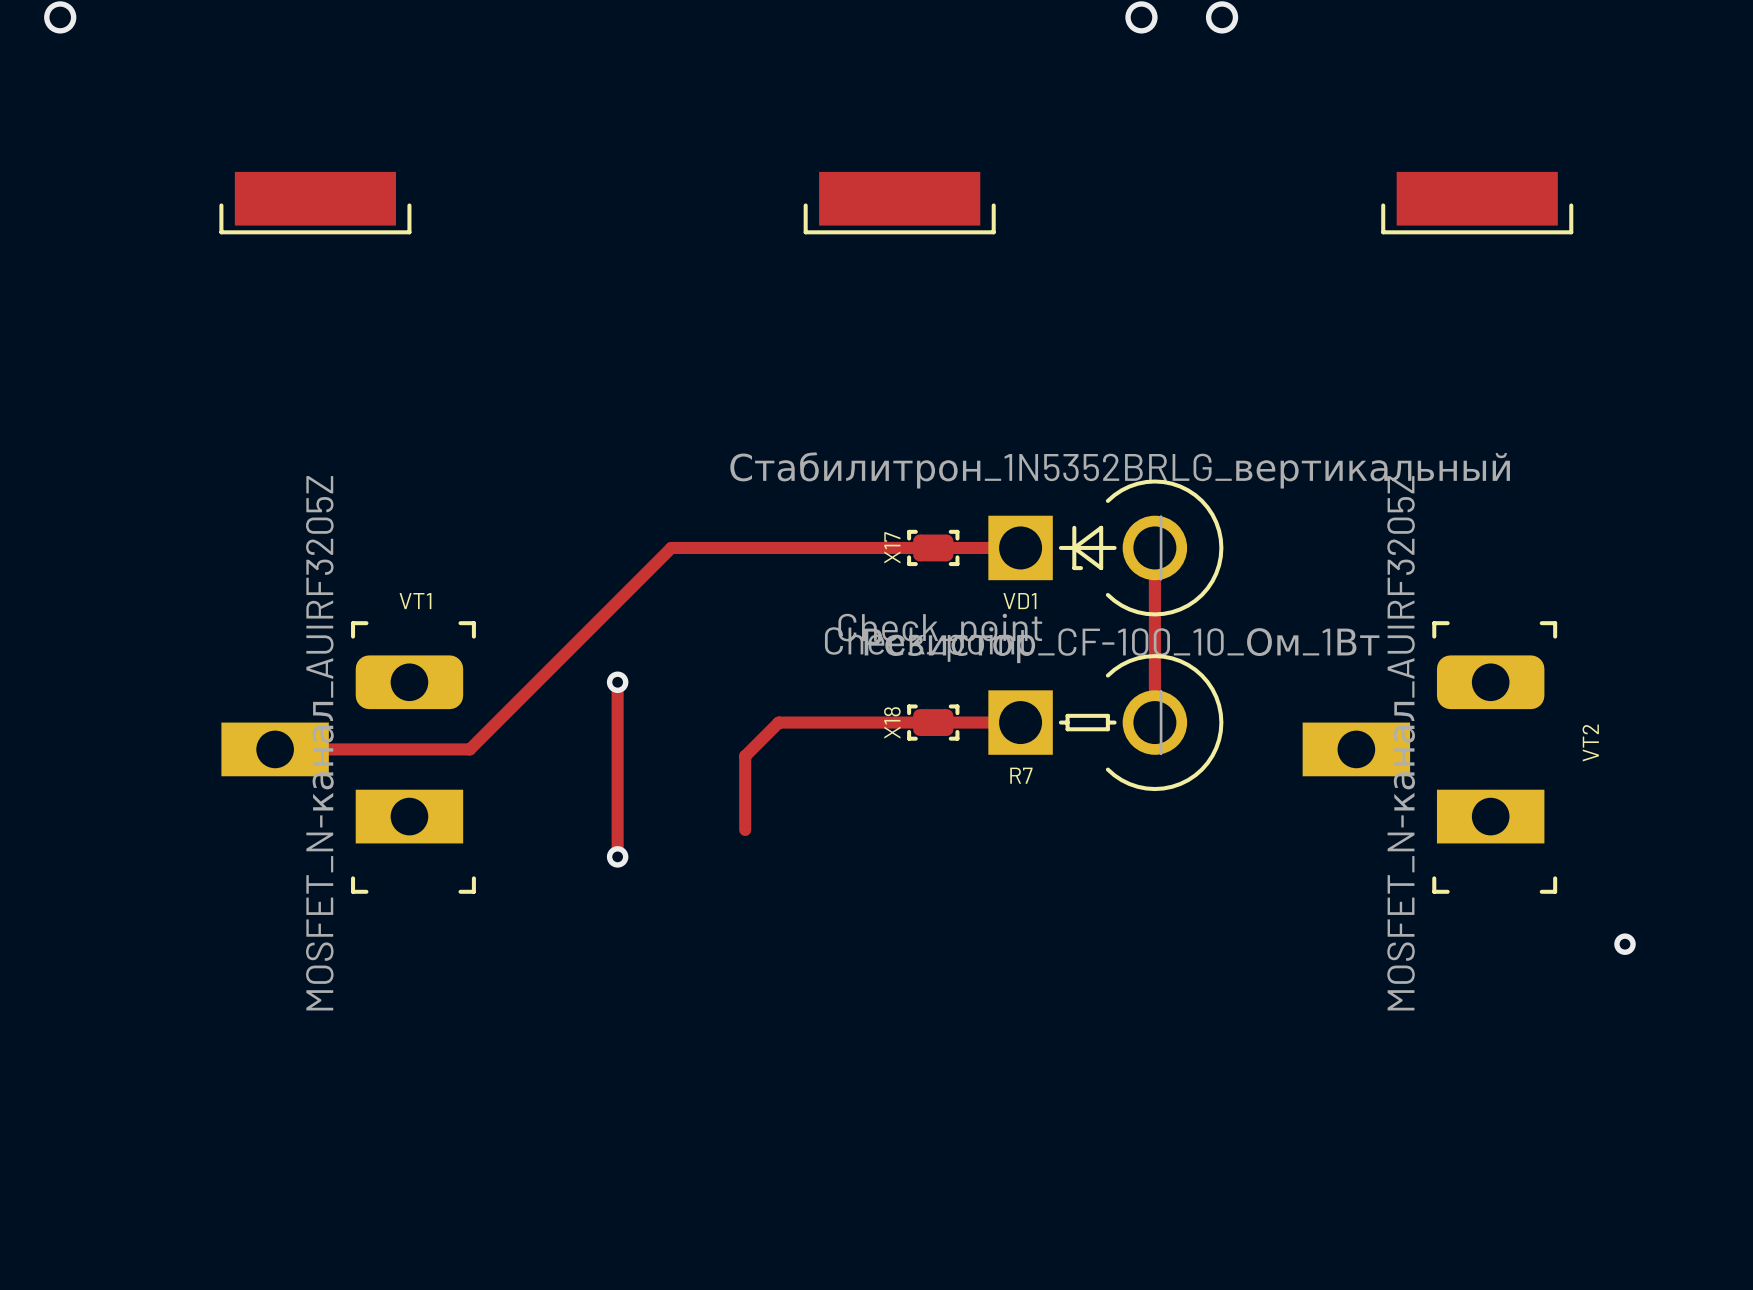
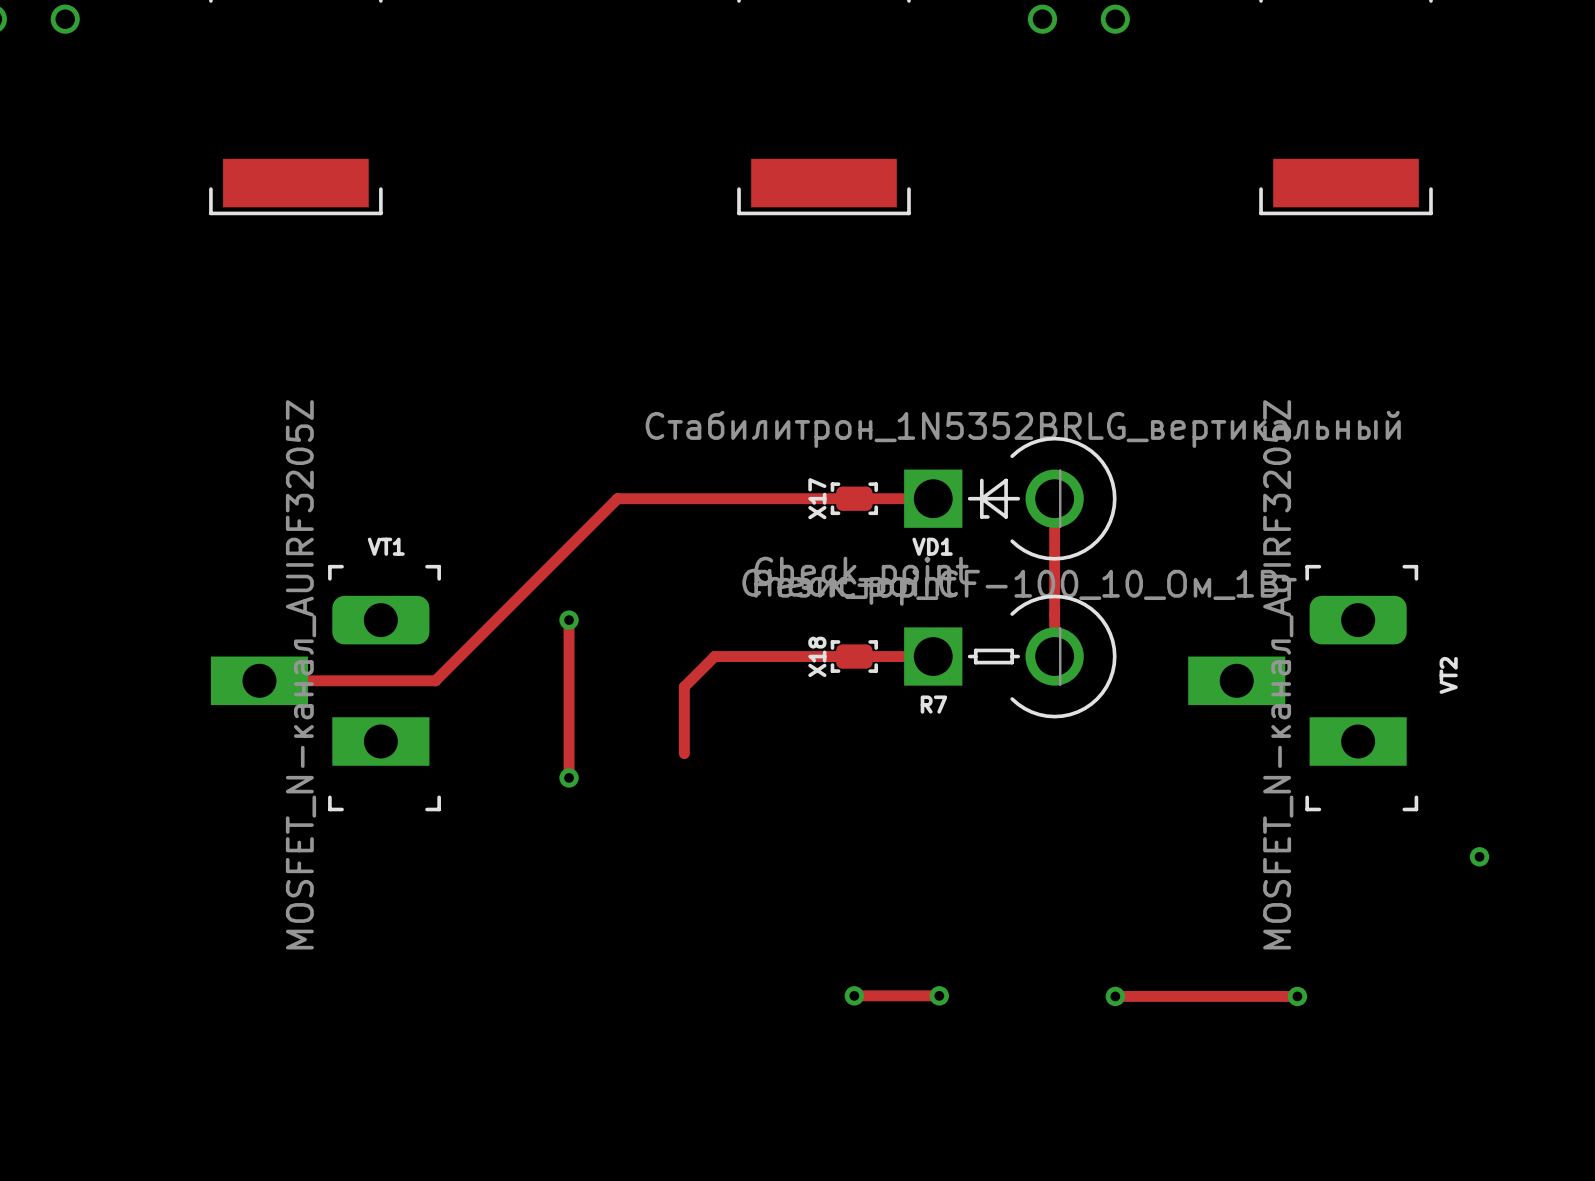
track: none -> (854, 995) (939, 995)
via: none -> (854, 995)
via: none -> (939, 995)
track: none -> (1115, 996) (1297, 996)
via: none -> (1115, 996)
via: none -> (1297, 996)

